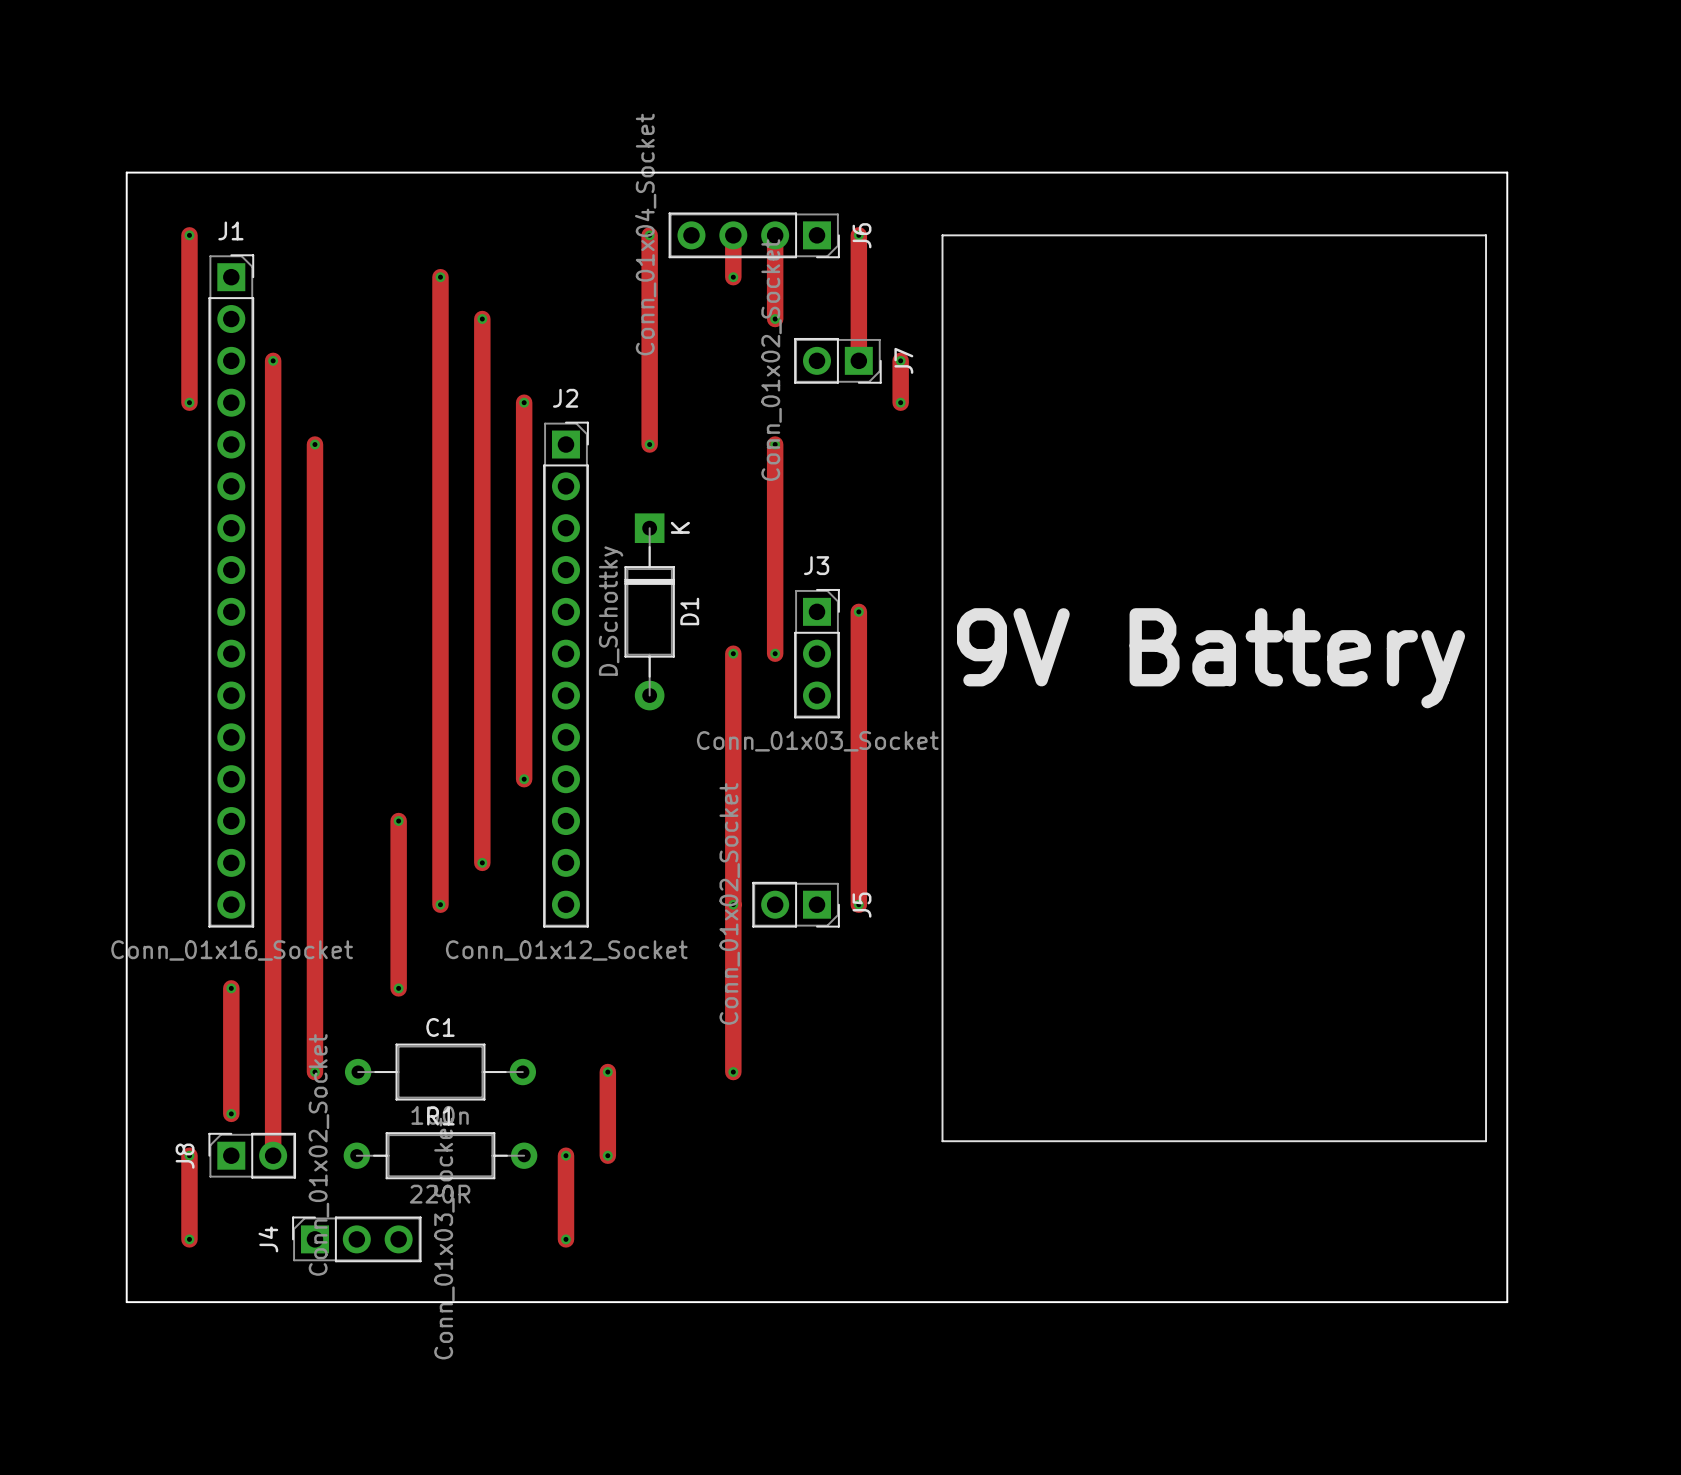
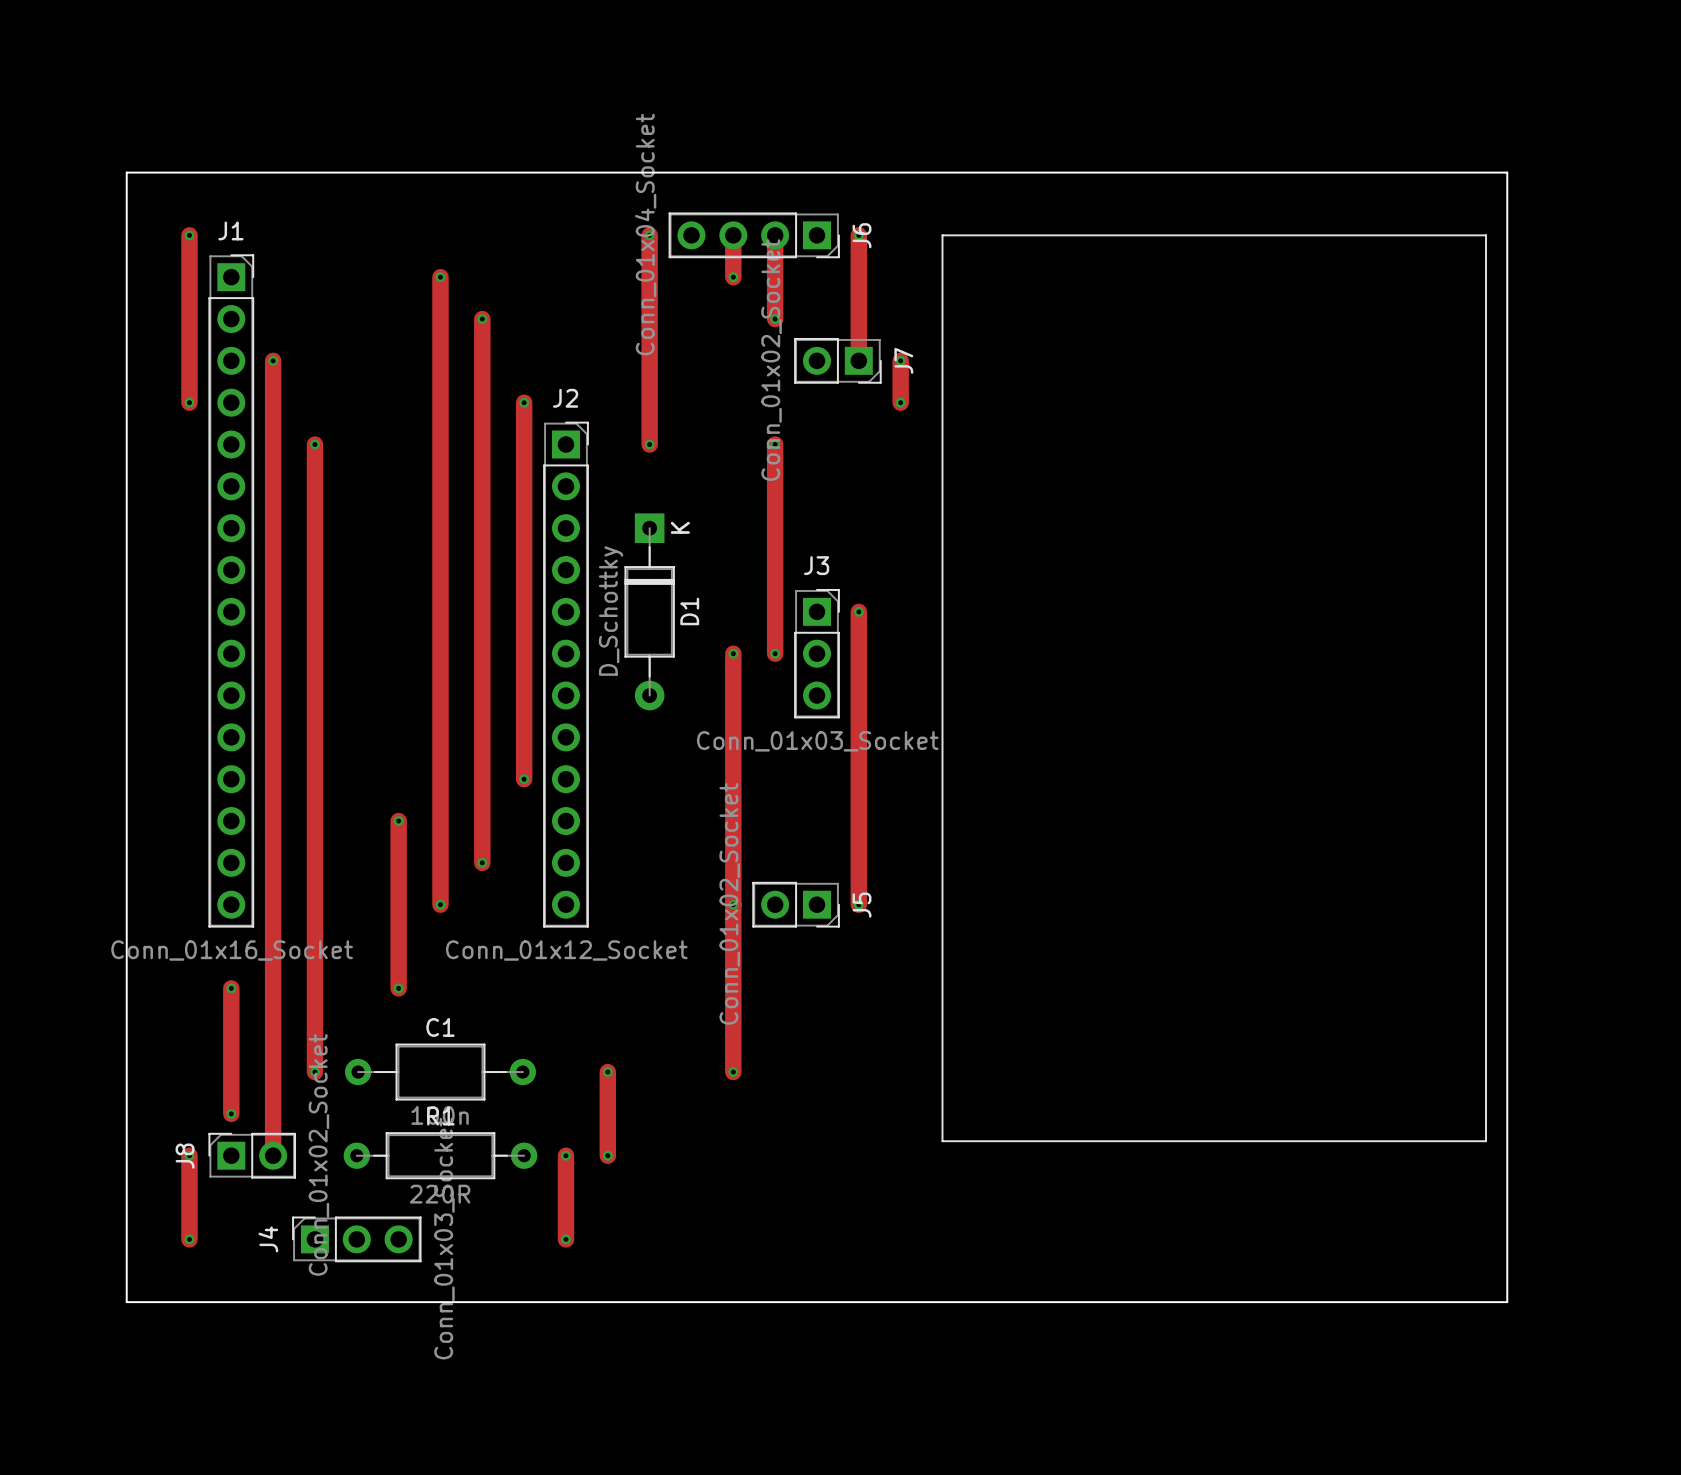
text: 9V Battery (1211, 658) -> none

